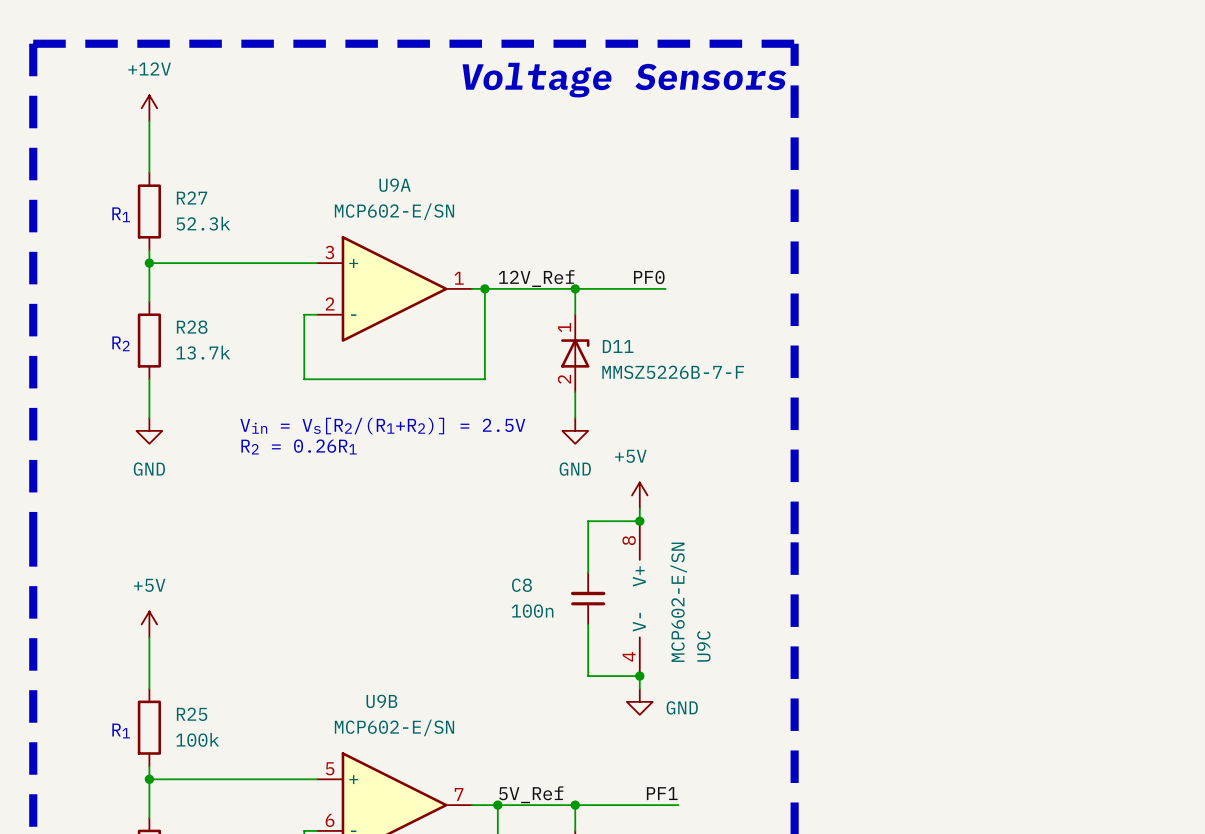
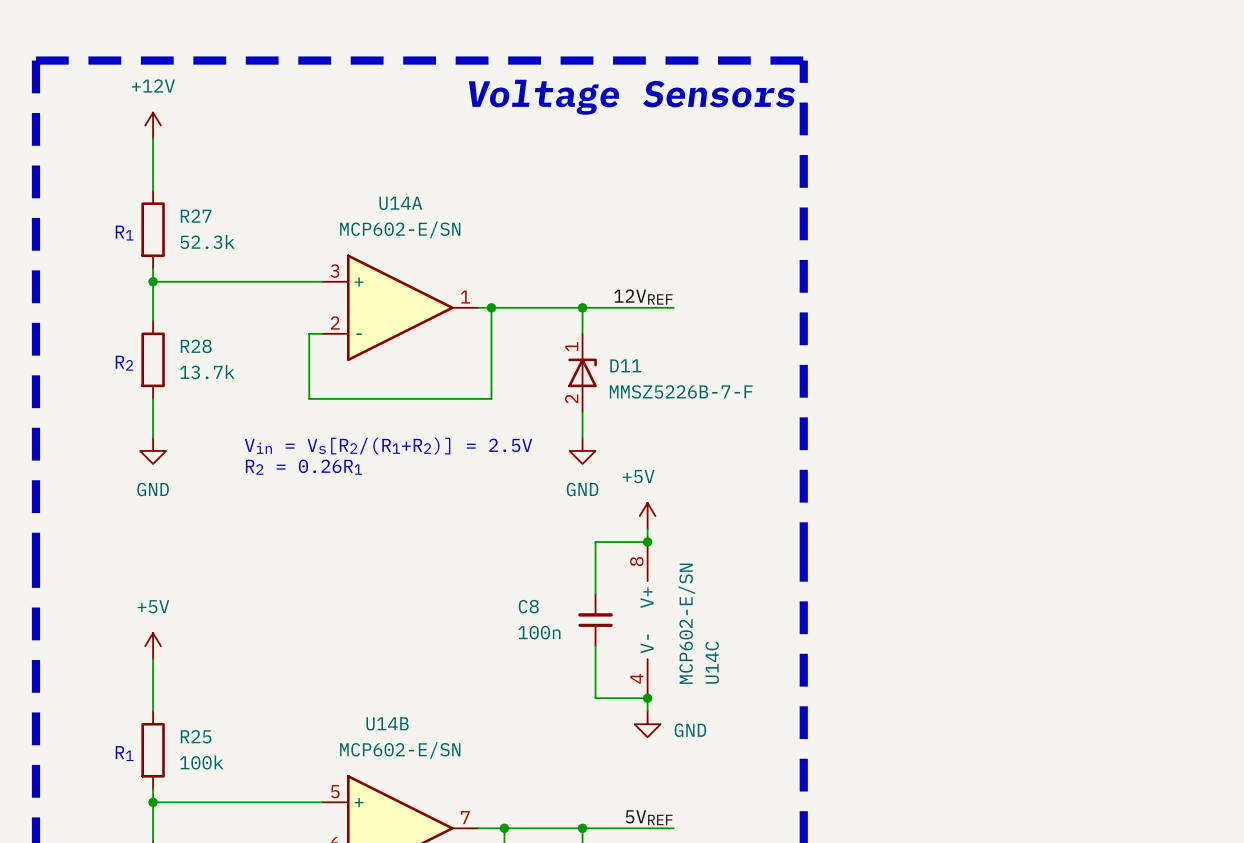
U9A name: U9A (395, 185) -> U14A (400, 203)
label: PF0 (649, 277) -> 12VREF (643, 297)
label: 12V_Ref (536, 278) -> none
U9C name: U9C (703, 646) -> U14C (712, 662)
U9B name: U9B (381, 701) -> U14B (387, 723)
label: PF1 (662, 793) -> none
label: 5V_Ref (531, 794) -> none
label: none -> 5VREF (649, 817)
wire: (665, 805) (678, 805) -> none

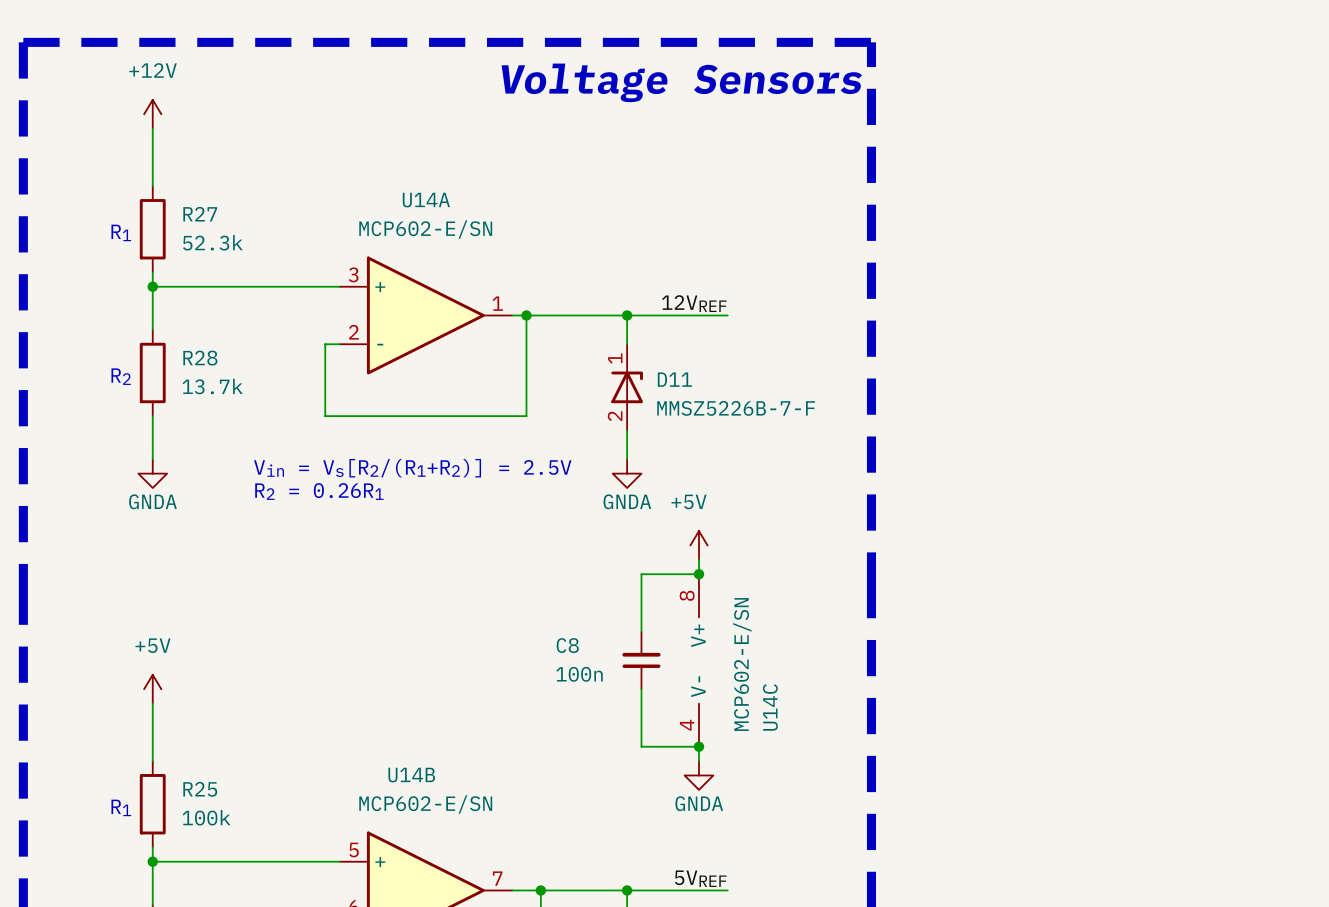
power symbol: GND (153, 450) -> GNDA (152, 473)
power symbol: GND (582, 450) -> GNDA (627, 473)
power symbol: GND (647, 724) -> GNDA (698, 775)

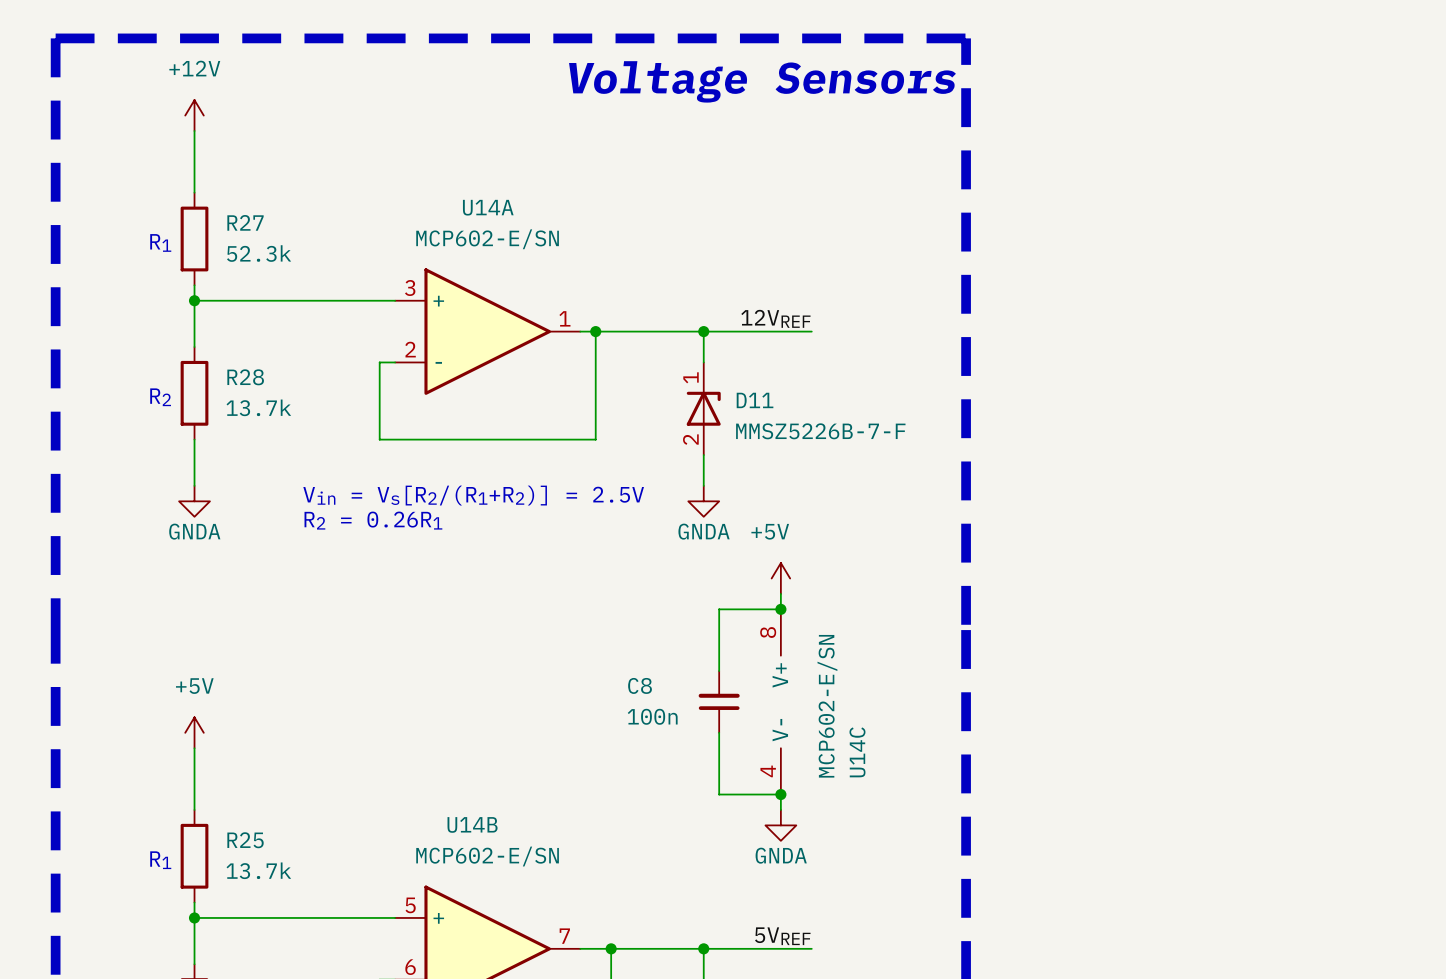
R25 value: 100k (206, 817) -> 13.7k (258, 870)

